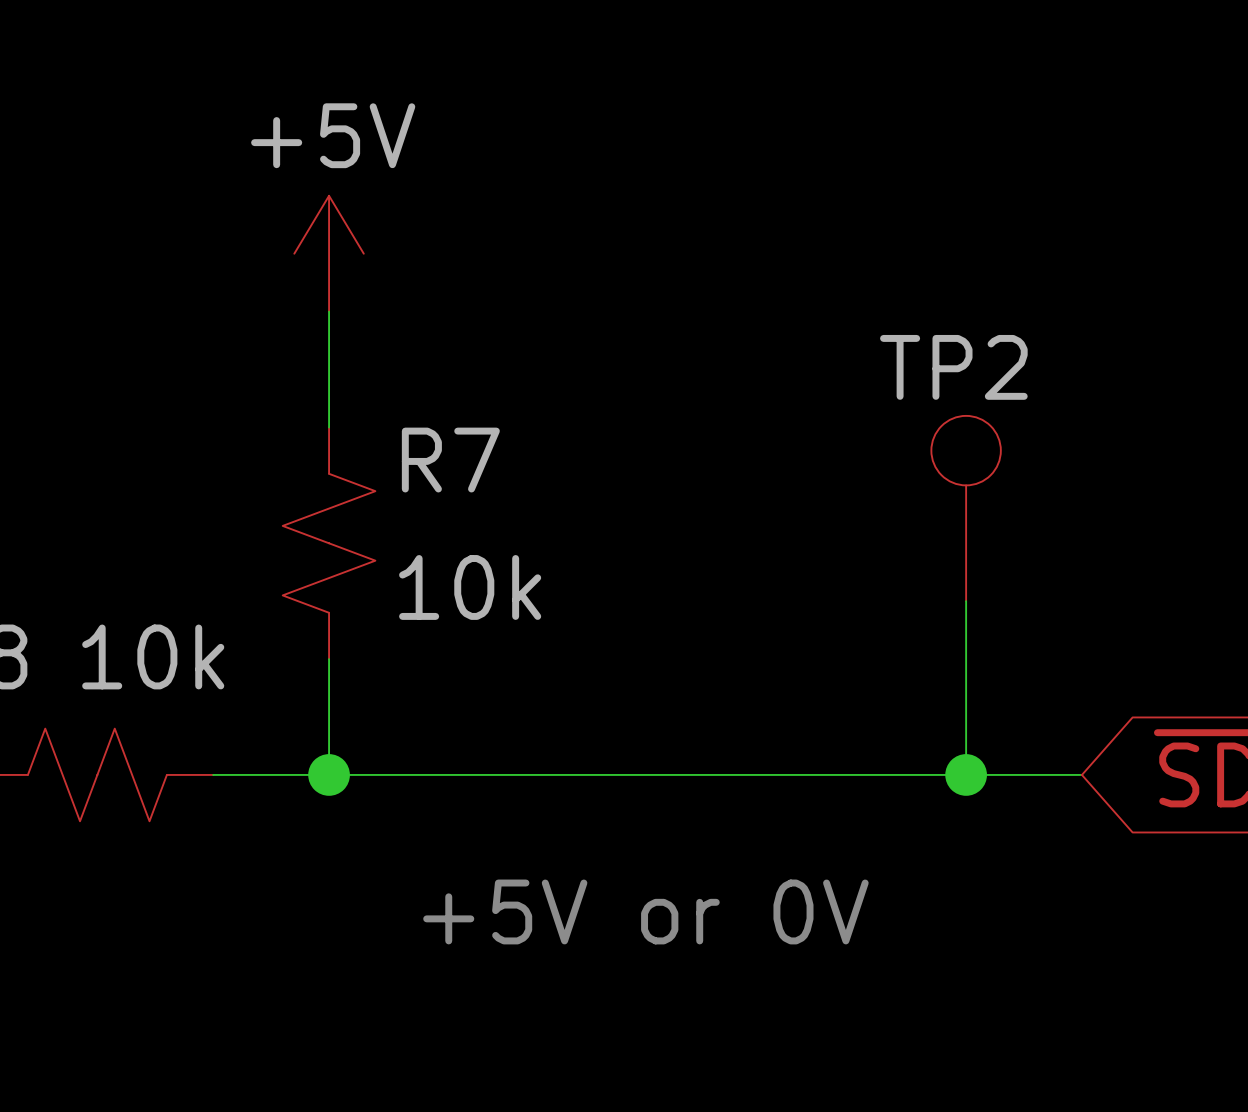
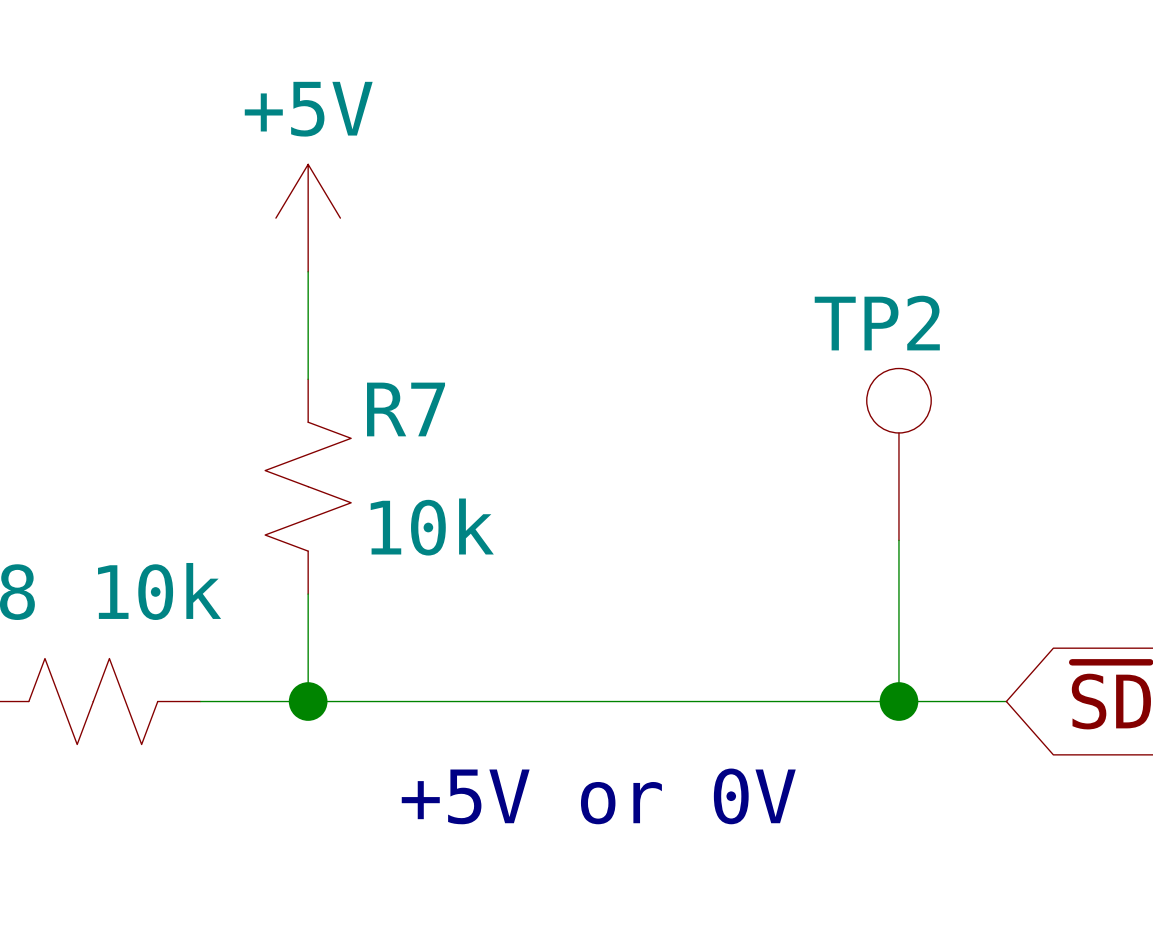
text position: +5V or 0V (645, 911) -> +5V or 0V (598, 796)

